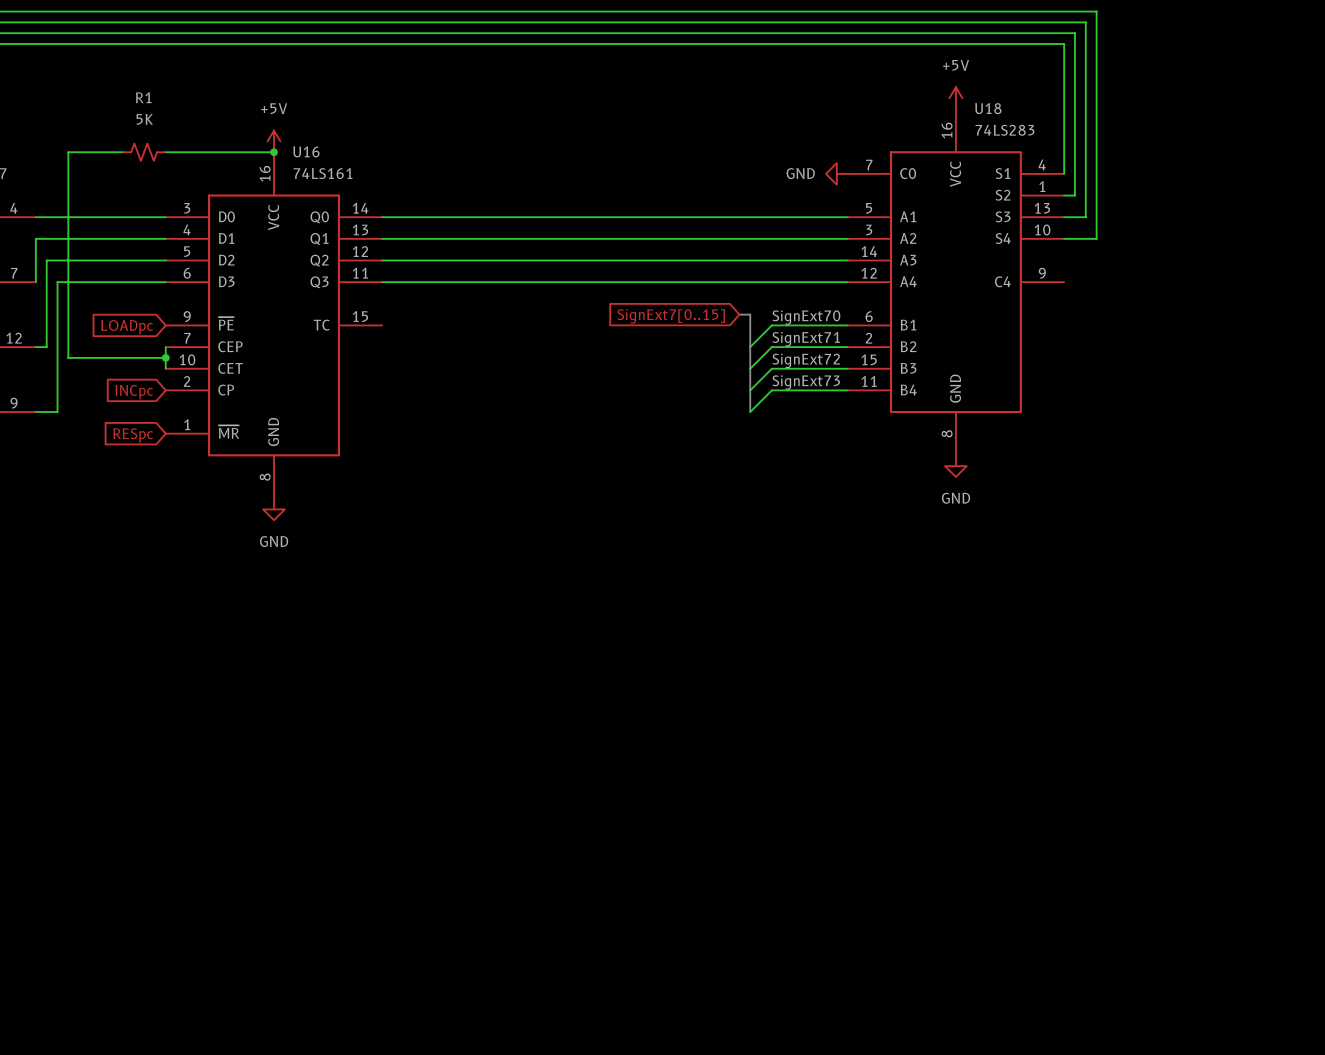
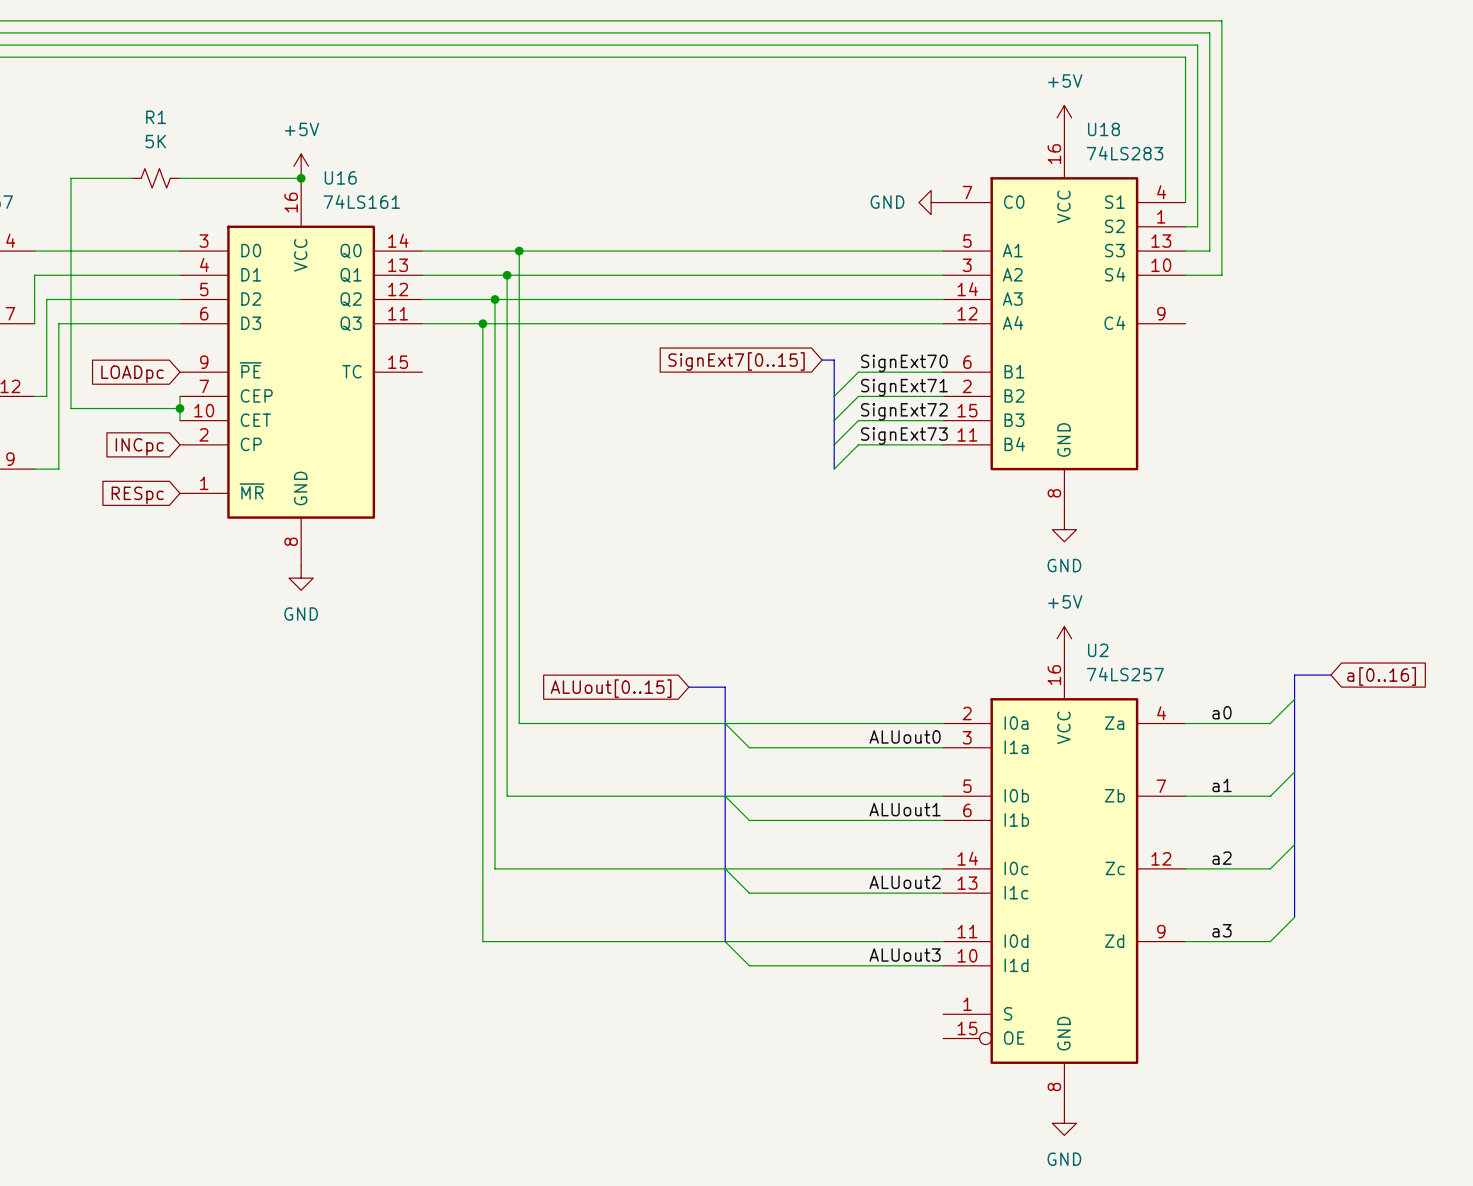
wire: none -> (519, 251) (519, 723) (943, 723)
junction: none -> (519, 251)
wire: none -> (507, 275) (507, 796) (943, 796)
junction: none -> (507, 275)
wire: none -> (494, 299) (494, 868) (943, 868)
junction: none -> (494, 299)
wire: none -> (482, 323) (482, 941) (943, 941)
junction: none -> (482, 323)
power symbol: none -> +5V (1064, 638)
bus: none -> (1330, 675) (1294, 675) (1294, 917)
global label: none -> a[0..16] (1381, 676)
bus: none -> (688, 687) (725, 687) (725, 941)
global label: none -> ALUout[0..15] (611, 688)
wire: none -> (1294, 699) (1270, 723) (1185, 723)
label: none -> a0 (1221, 712)
wire: none -> (725, 723) (749, 747) (943, 747)
label: none -> ALUout0 (905, 736)
wire: none -> (1294, 771) (1270, 796) (1185, 796)
label: none -> a1 (1221, 785)
wire: none -> (725, 796) (749, 820) (943, 820)
label: none -> ALUout1 (905, 809)
wire: none -> (1294, 844) (1270, 868) (1185, 868)
label: none -> a2 (1221, 858)
wire: none -> (725, 868) (749, 893) (943, 893)
U2: none -> 74LS257 (1064, 881)
label: none -> ALUout2 (905, 882)
wire: none -> (1294, 917) (1270, 941) (1185, 941)
label: none -> a3 (1221, 930)
wire: none -> (725, 941) (749, 965) (943, 965)
label: none -> ALUout3 (905, 955)
power symbol: none -> GND (1064, 1123)

